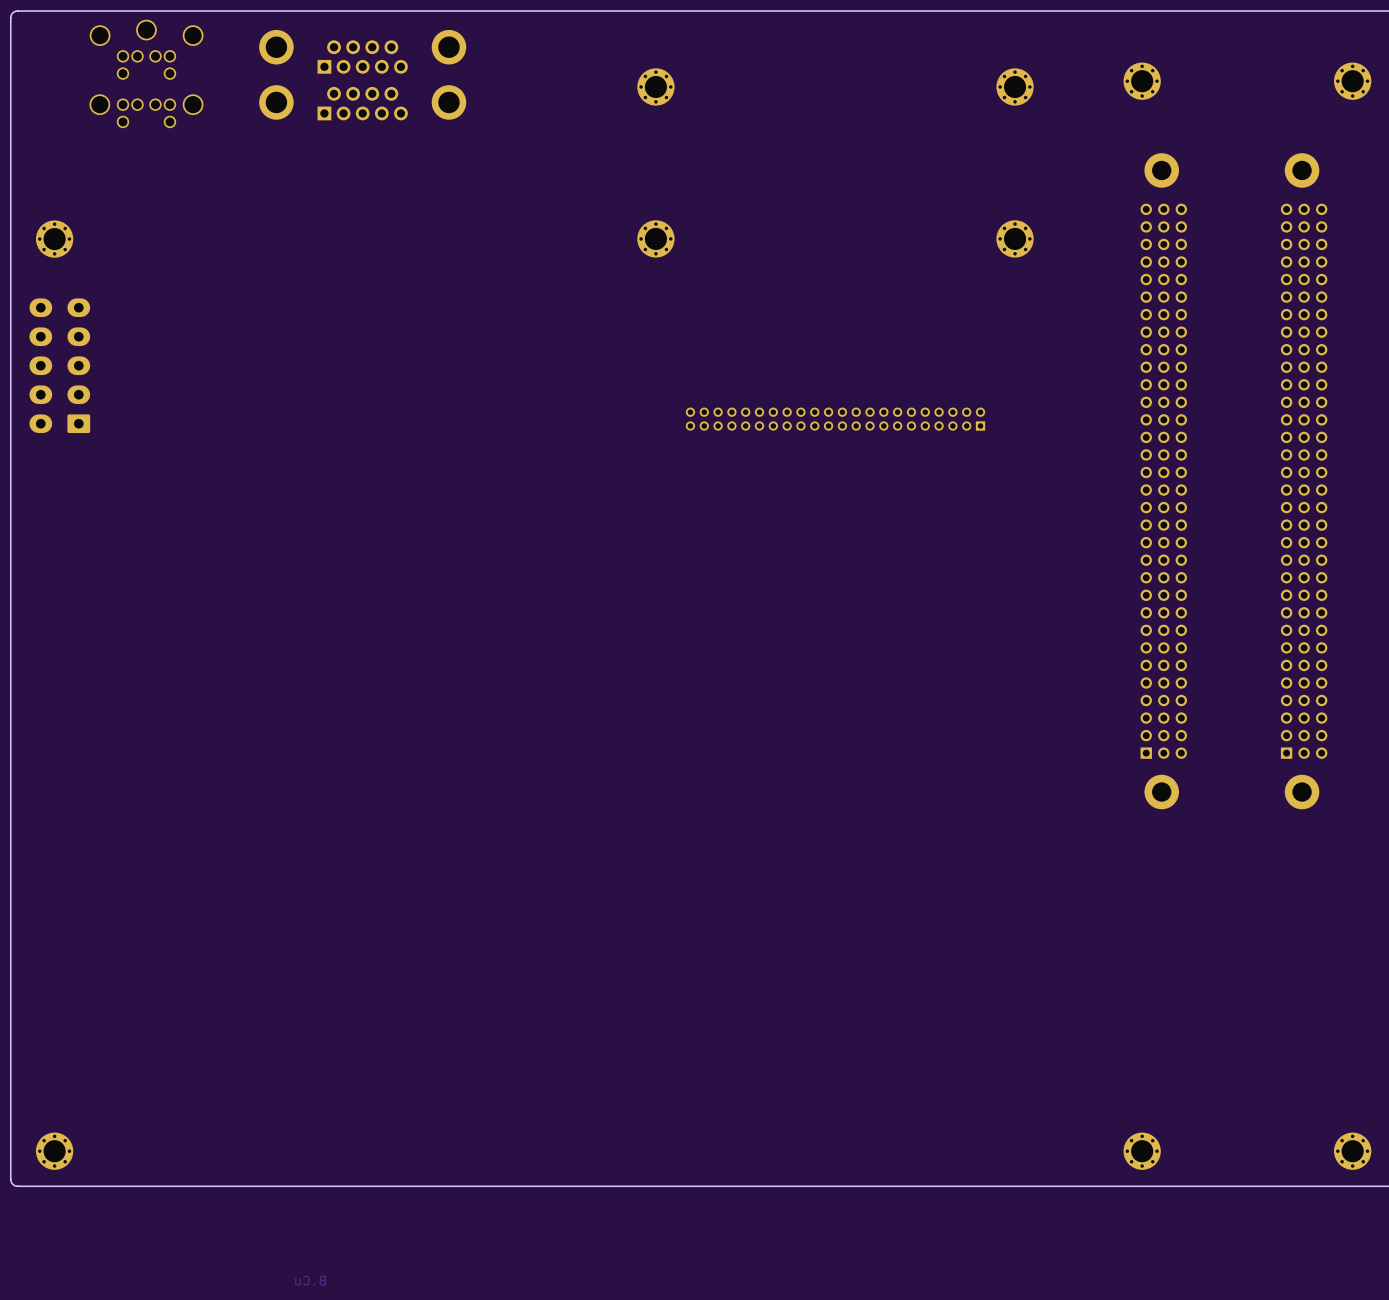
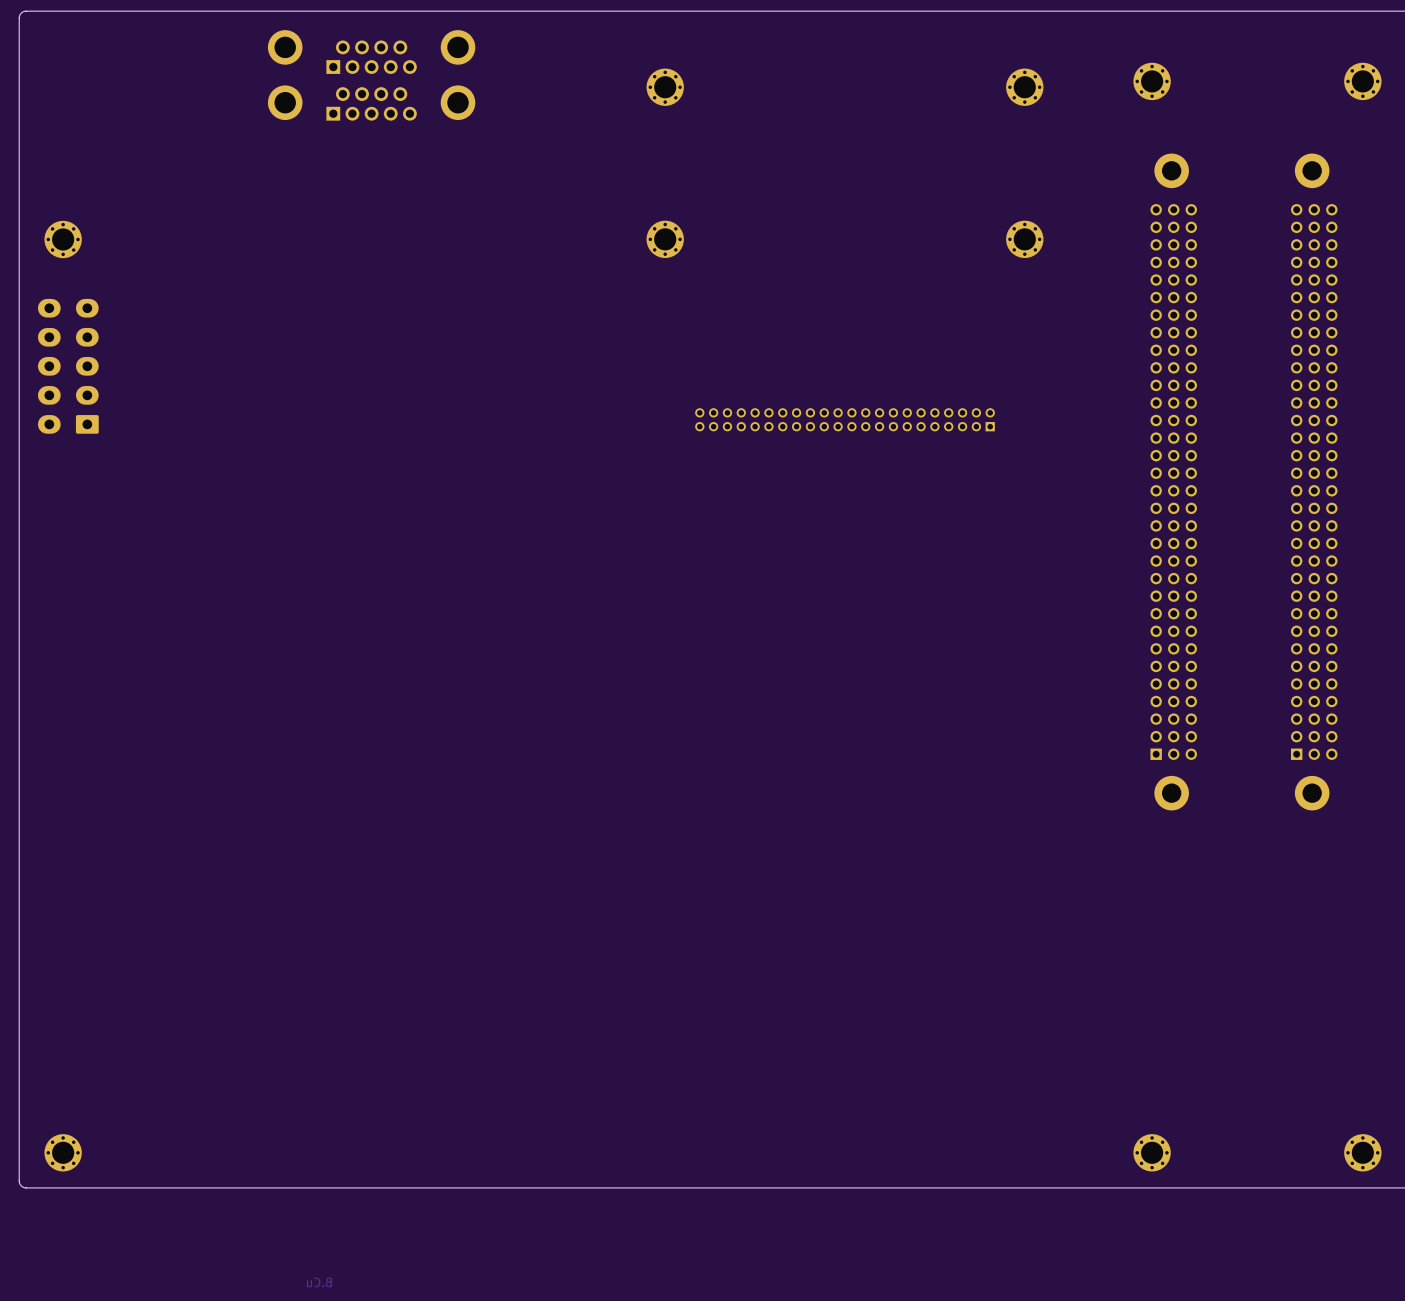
part: (146, 73) -> none

